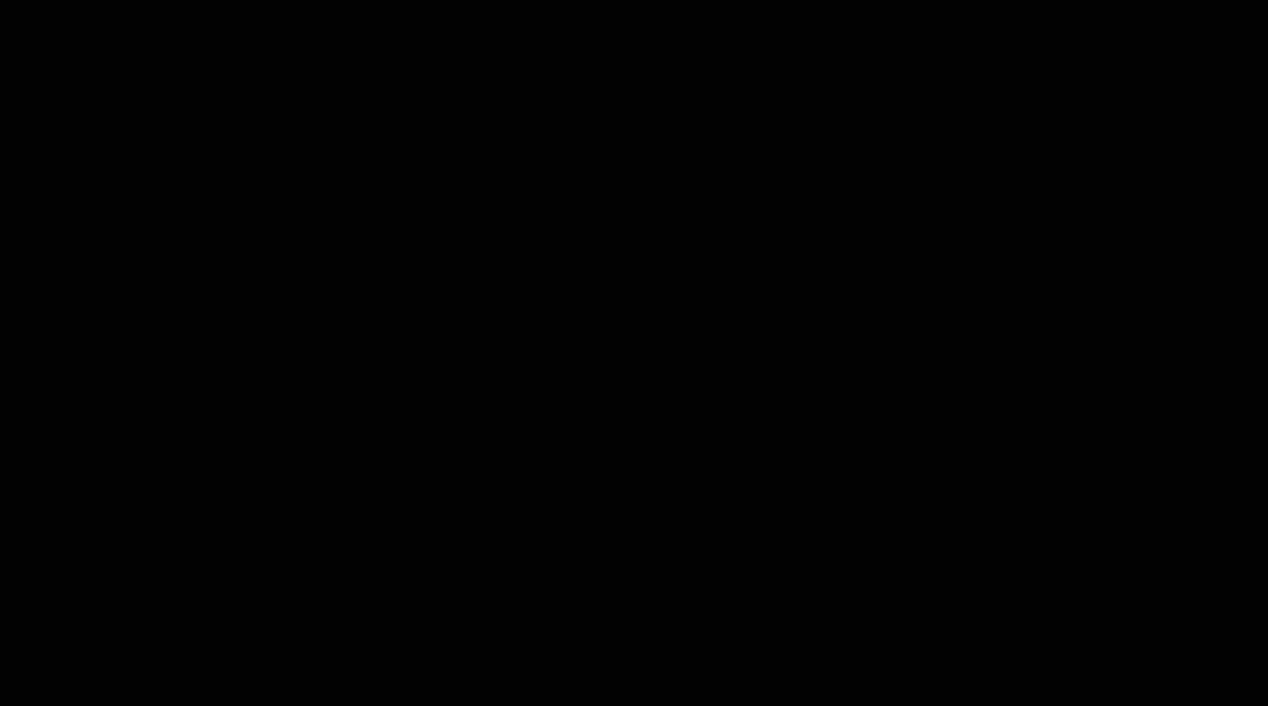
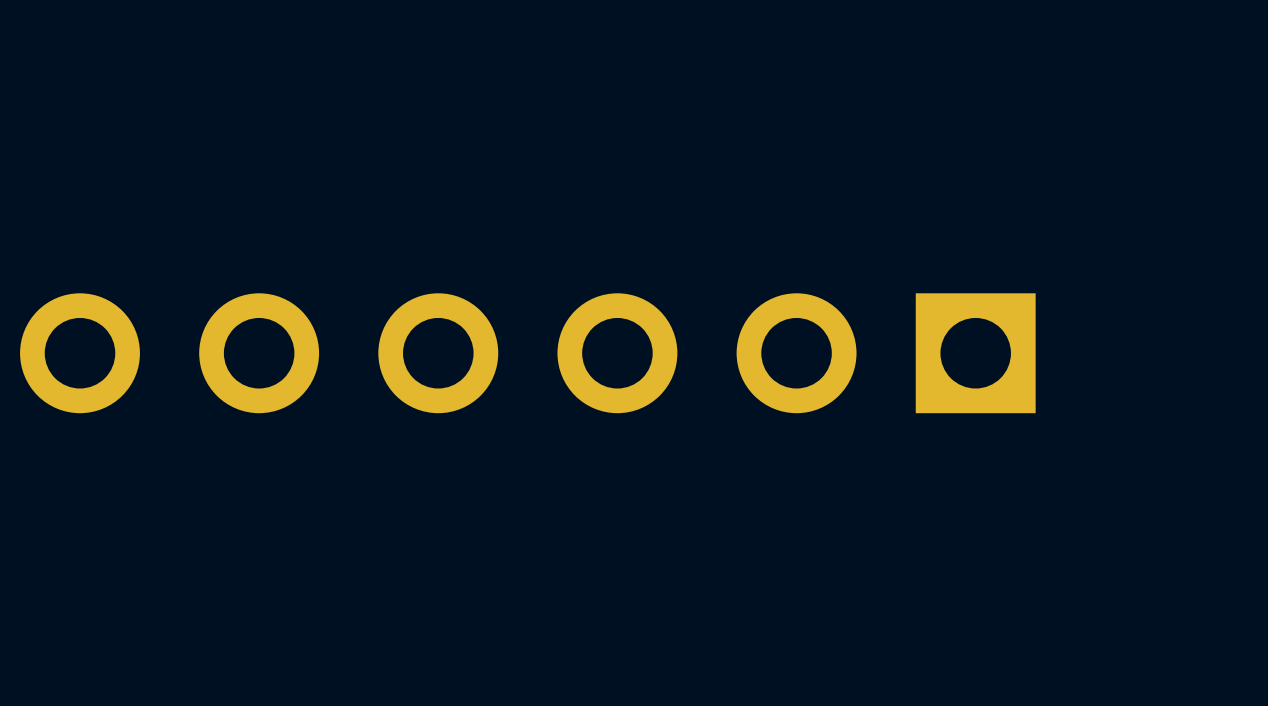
part: none -> (527, 353)

